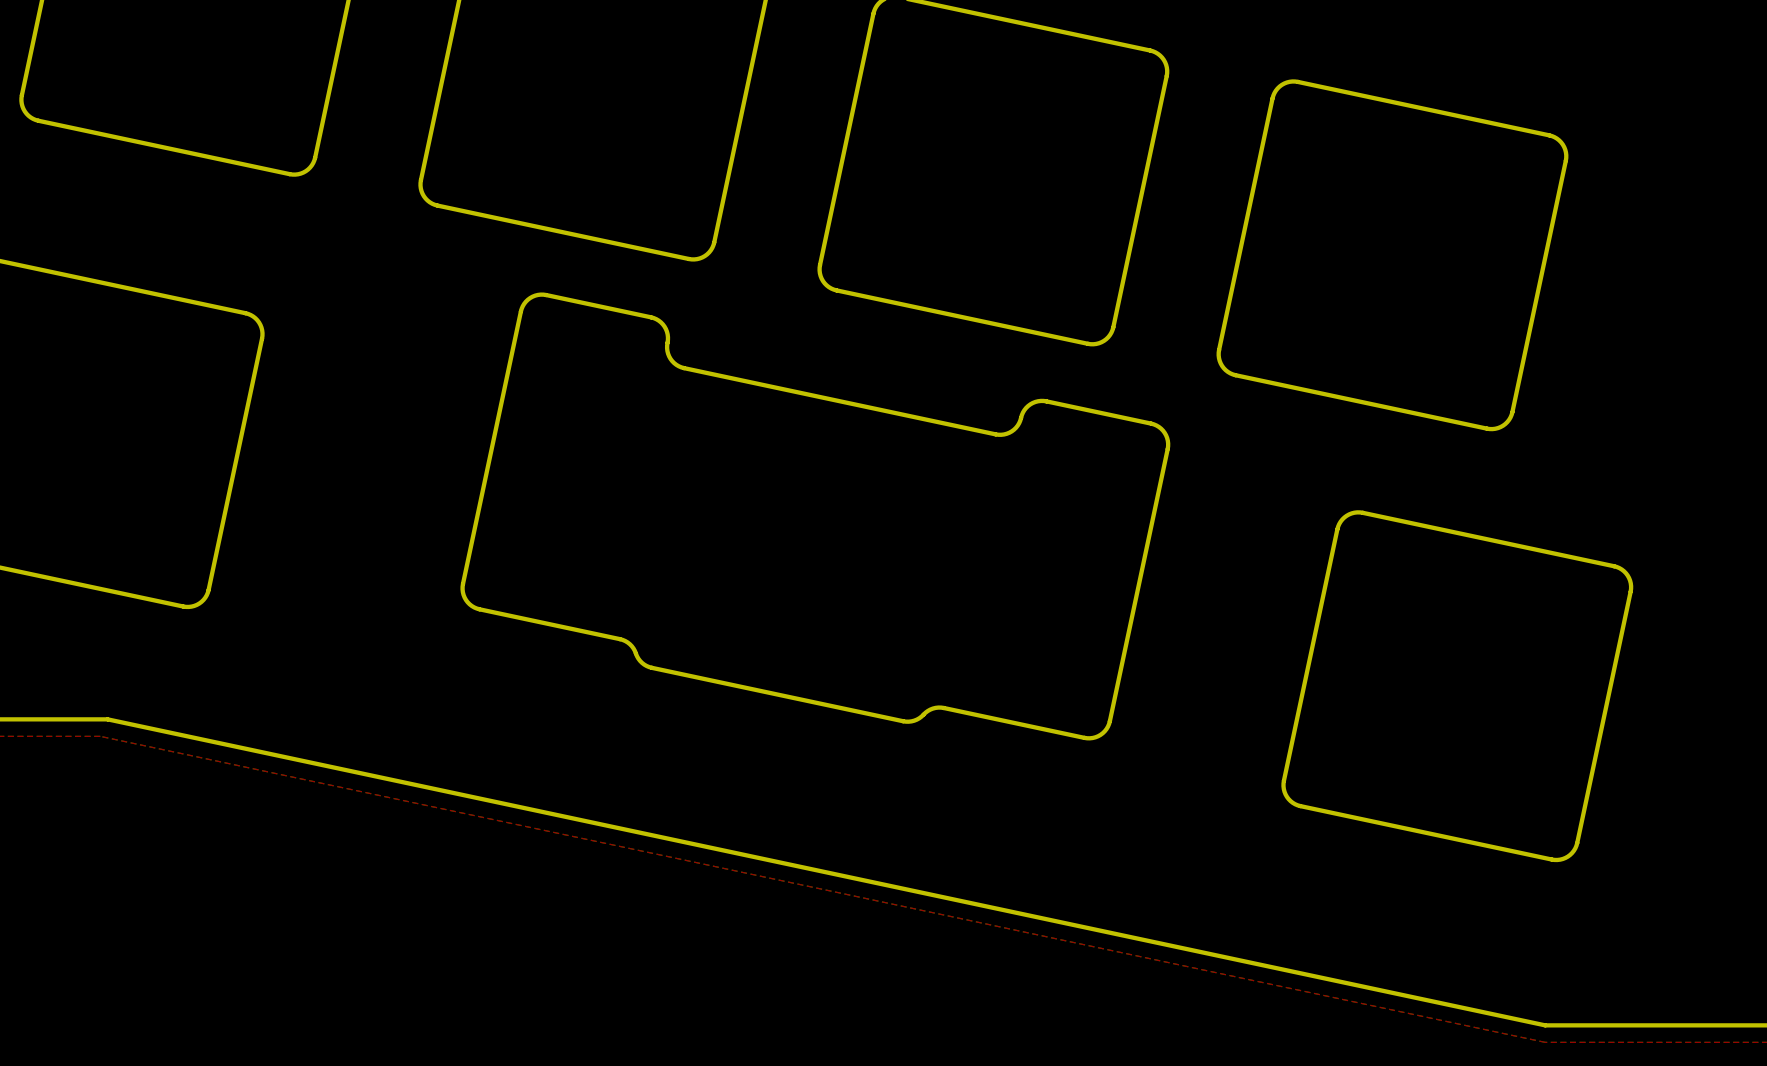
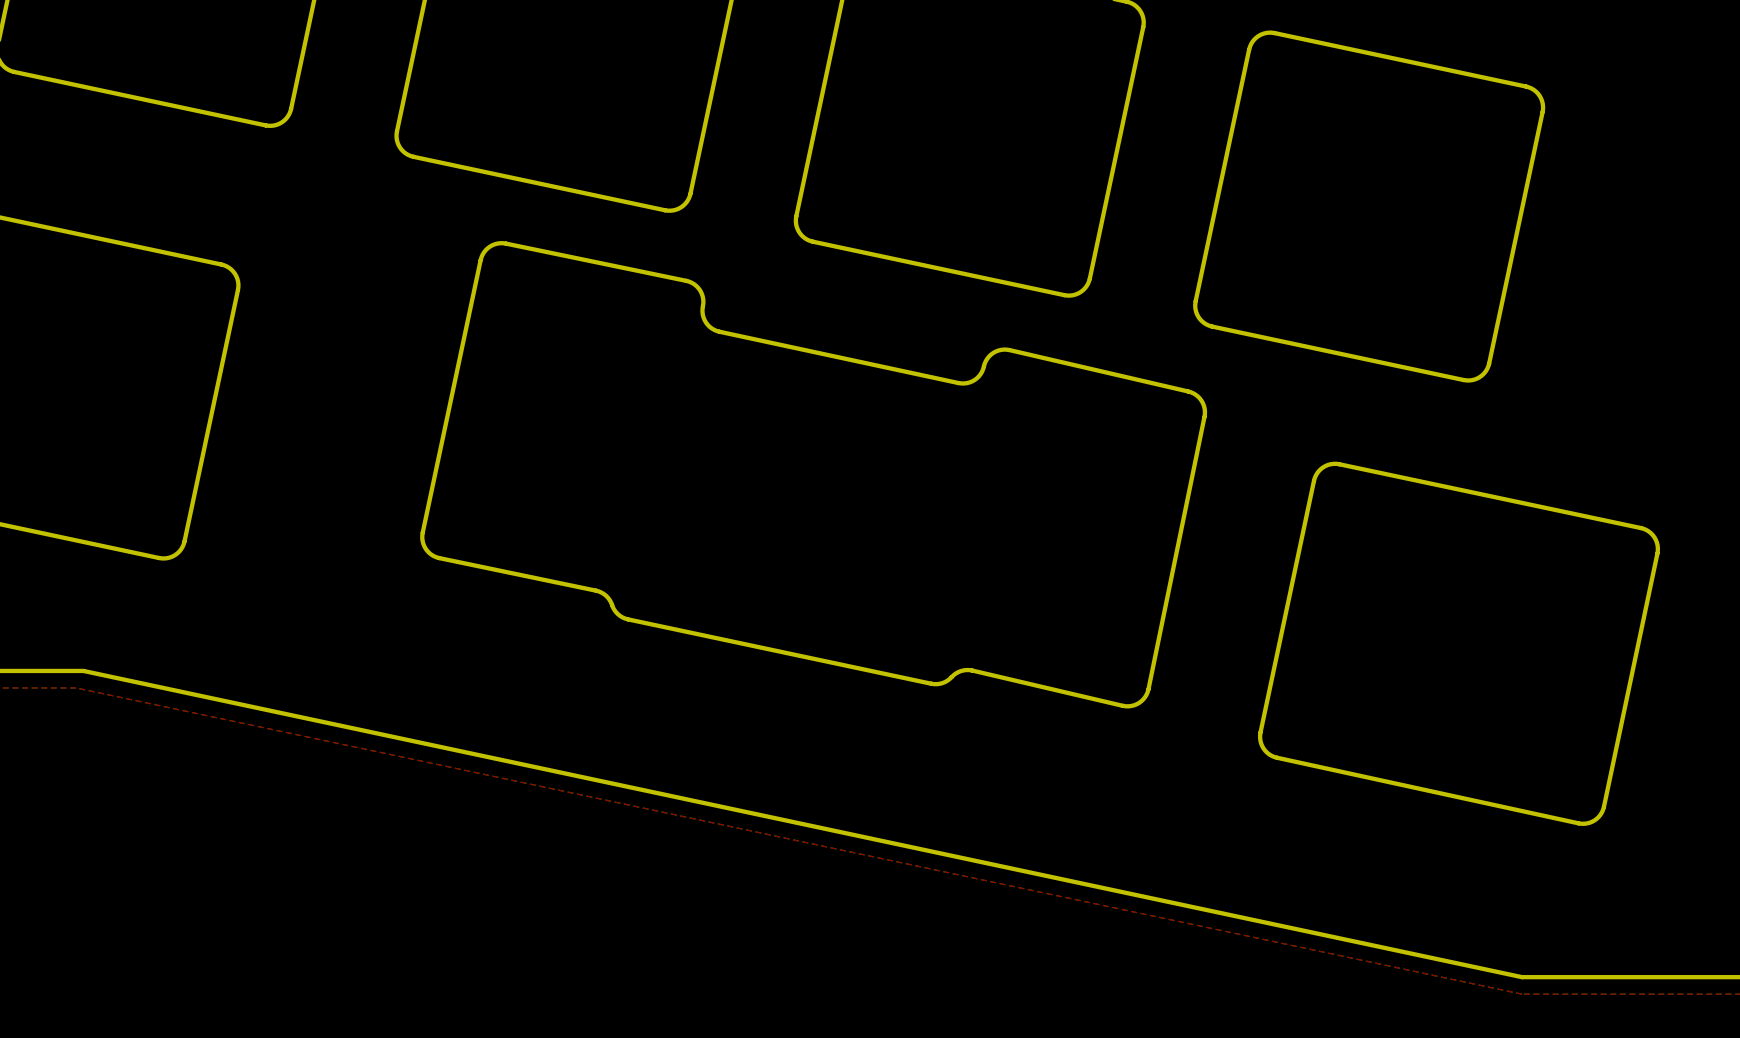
board edge: (1362, 512) (1616, 567) (1627, 575) (1630, 583) (1630, 591) (1577, 843) (1573, 850) (1567, 856) (1560, 859) (1551, 859) (1300, 806) -> (1339, 464) (1640, 528) (1652, 535) (1657, 545) (1657, 553) (1603, 806) (1600, 814) (1594, 820) (1586, 823) (1578, 823) (1277, 757)
board edge: (619, 639) (476, 608) (467, 602) (462, 592) (463, 583) (520, 311) (525, 301) (535, 295) (546, 295) (656, 319) (662, 324) (666, 331) (667, 351) (670, 358) (676, 364) (684, 368) (998, 434) (1006, 433) (1014, 429) (1026, 407) (1032, 402) (1040, 400) (1151, 423) (1161, 428) (1166, 435) (1167, 449) (1109, 721) (1104, 731) (1098, 736) (1084, 737) (941, 707) (930, 709) (914, 720) (903, 721) (651, 667) -> (596, 590) (439, 558) (429, 553) (423, 543) (422, 532) (480, 260) (485, 250) (494, 244) (506, 243) (689, 281) (696, 285) (701, 292) (702, 314) (705, 322) (711, 328) (719, 331) (961, 383) (969, 382) (976, 378) (987, 358) (993, 353) (1000, 349) (1009, 350) (1190, 392) (1199, 398) (1203, 405) (1204, 416) (1148, 689) (1143, 699) (1134, 705) (1123, 705) (969, 670) (958, 672) (942, 683) (931, 683) (628, 619)

